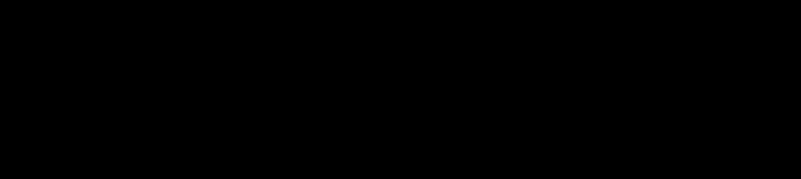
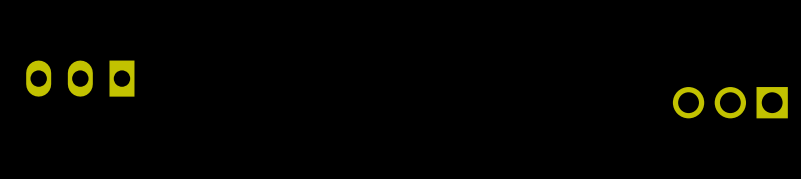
part: none -> (80, 78)
part: none -> (730, 102)

